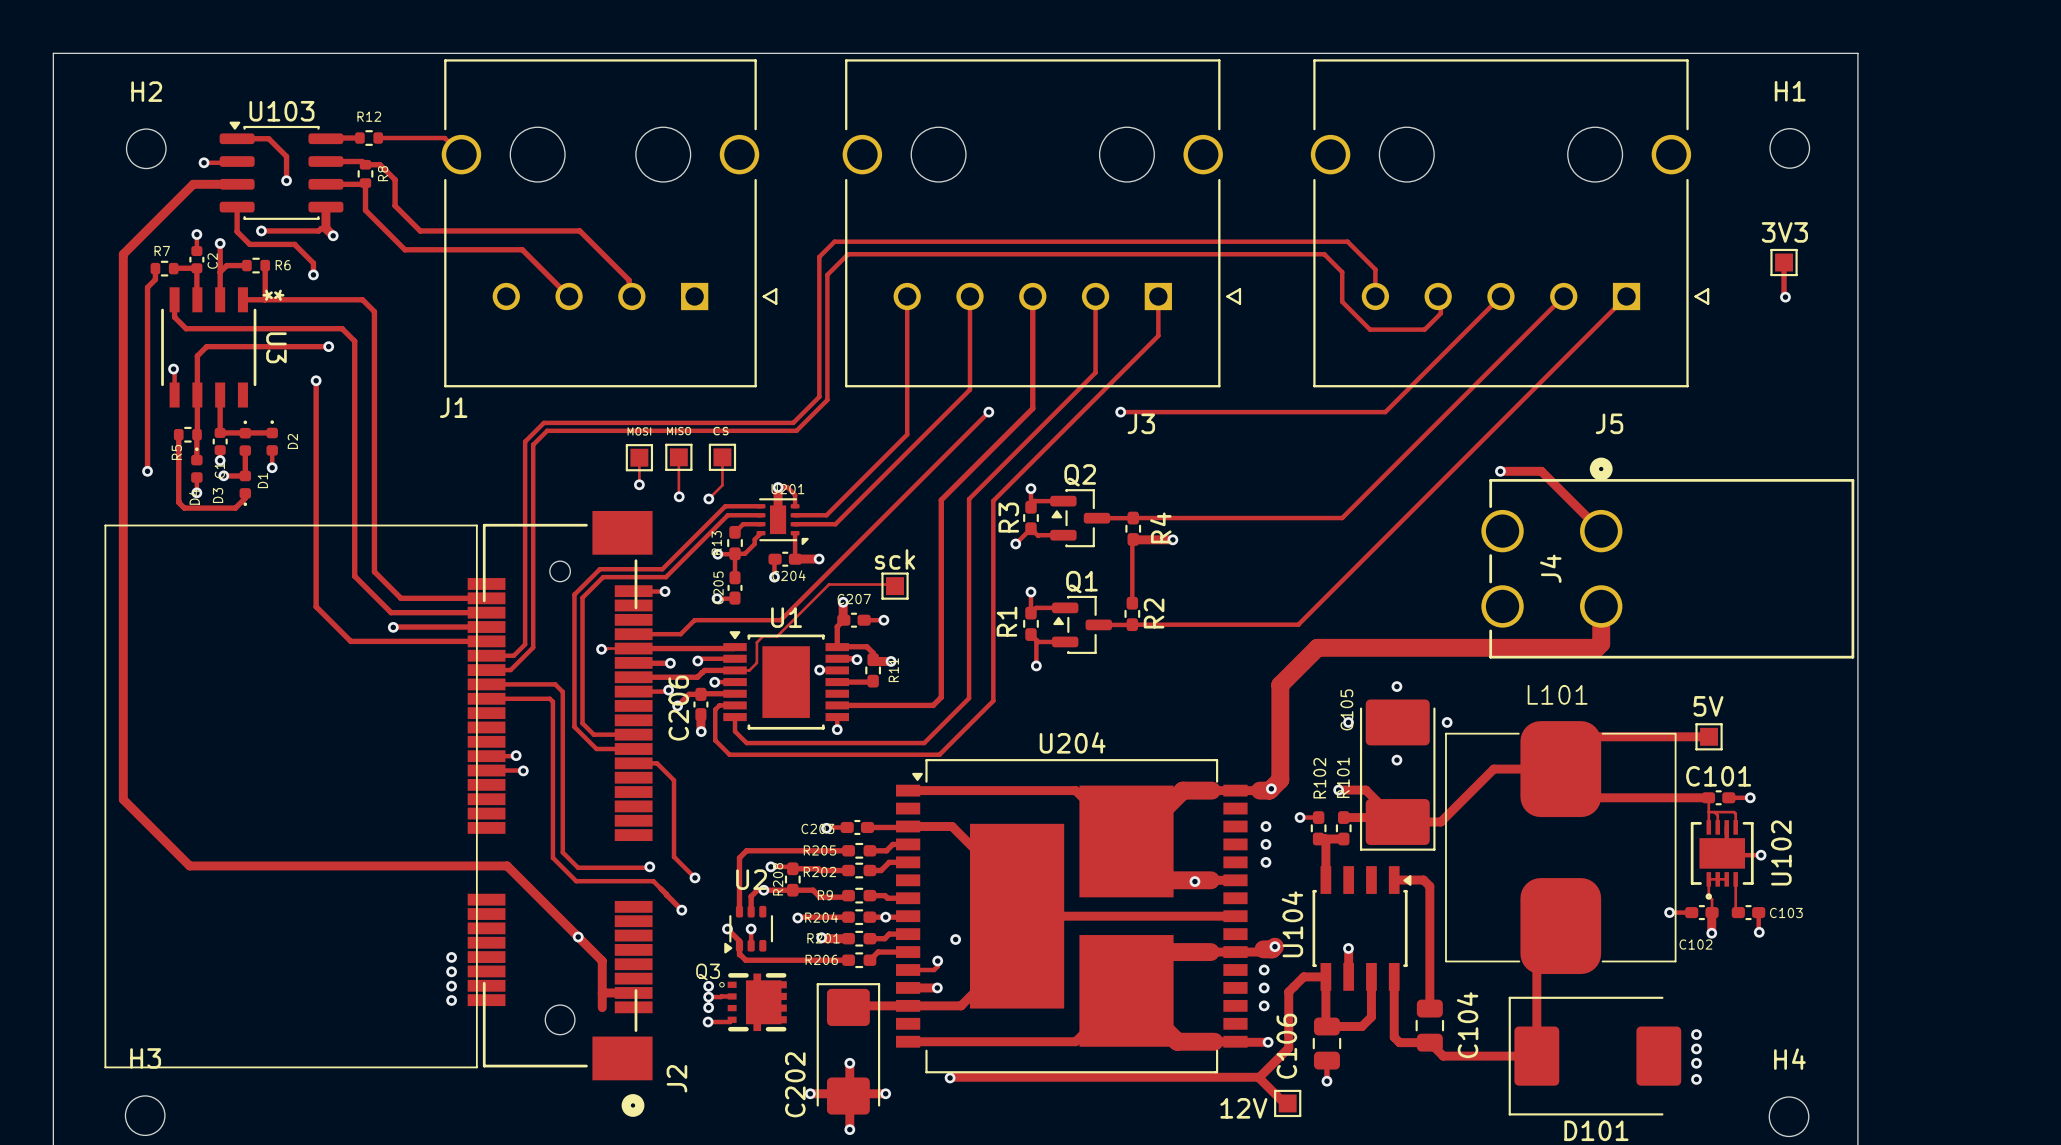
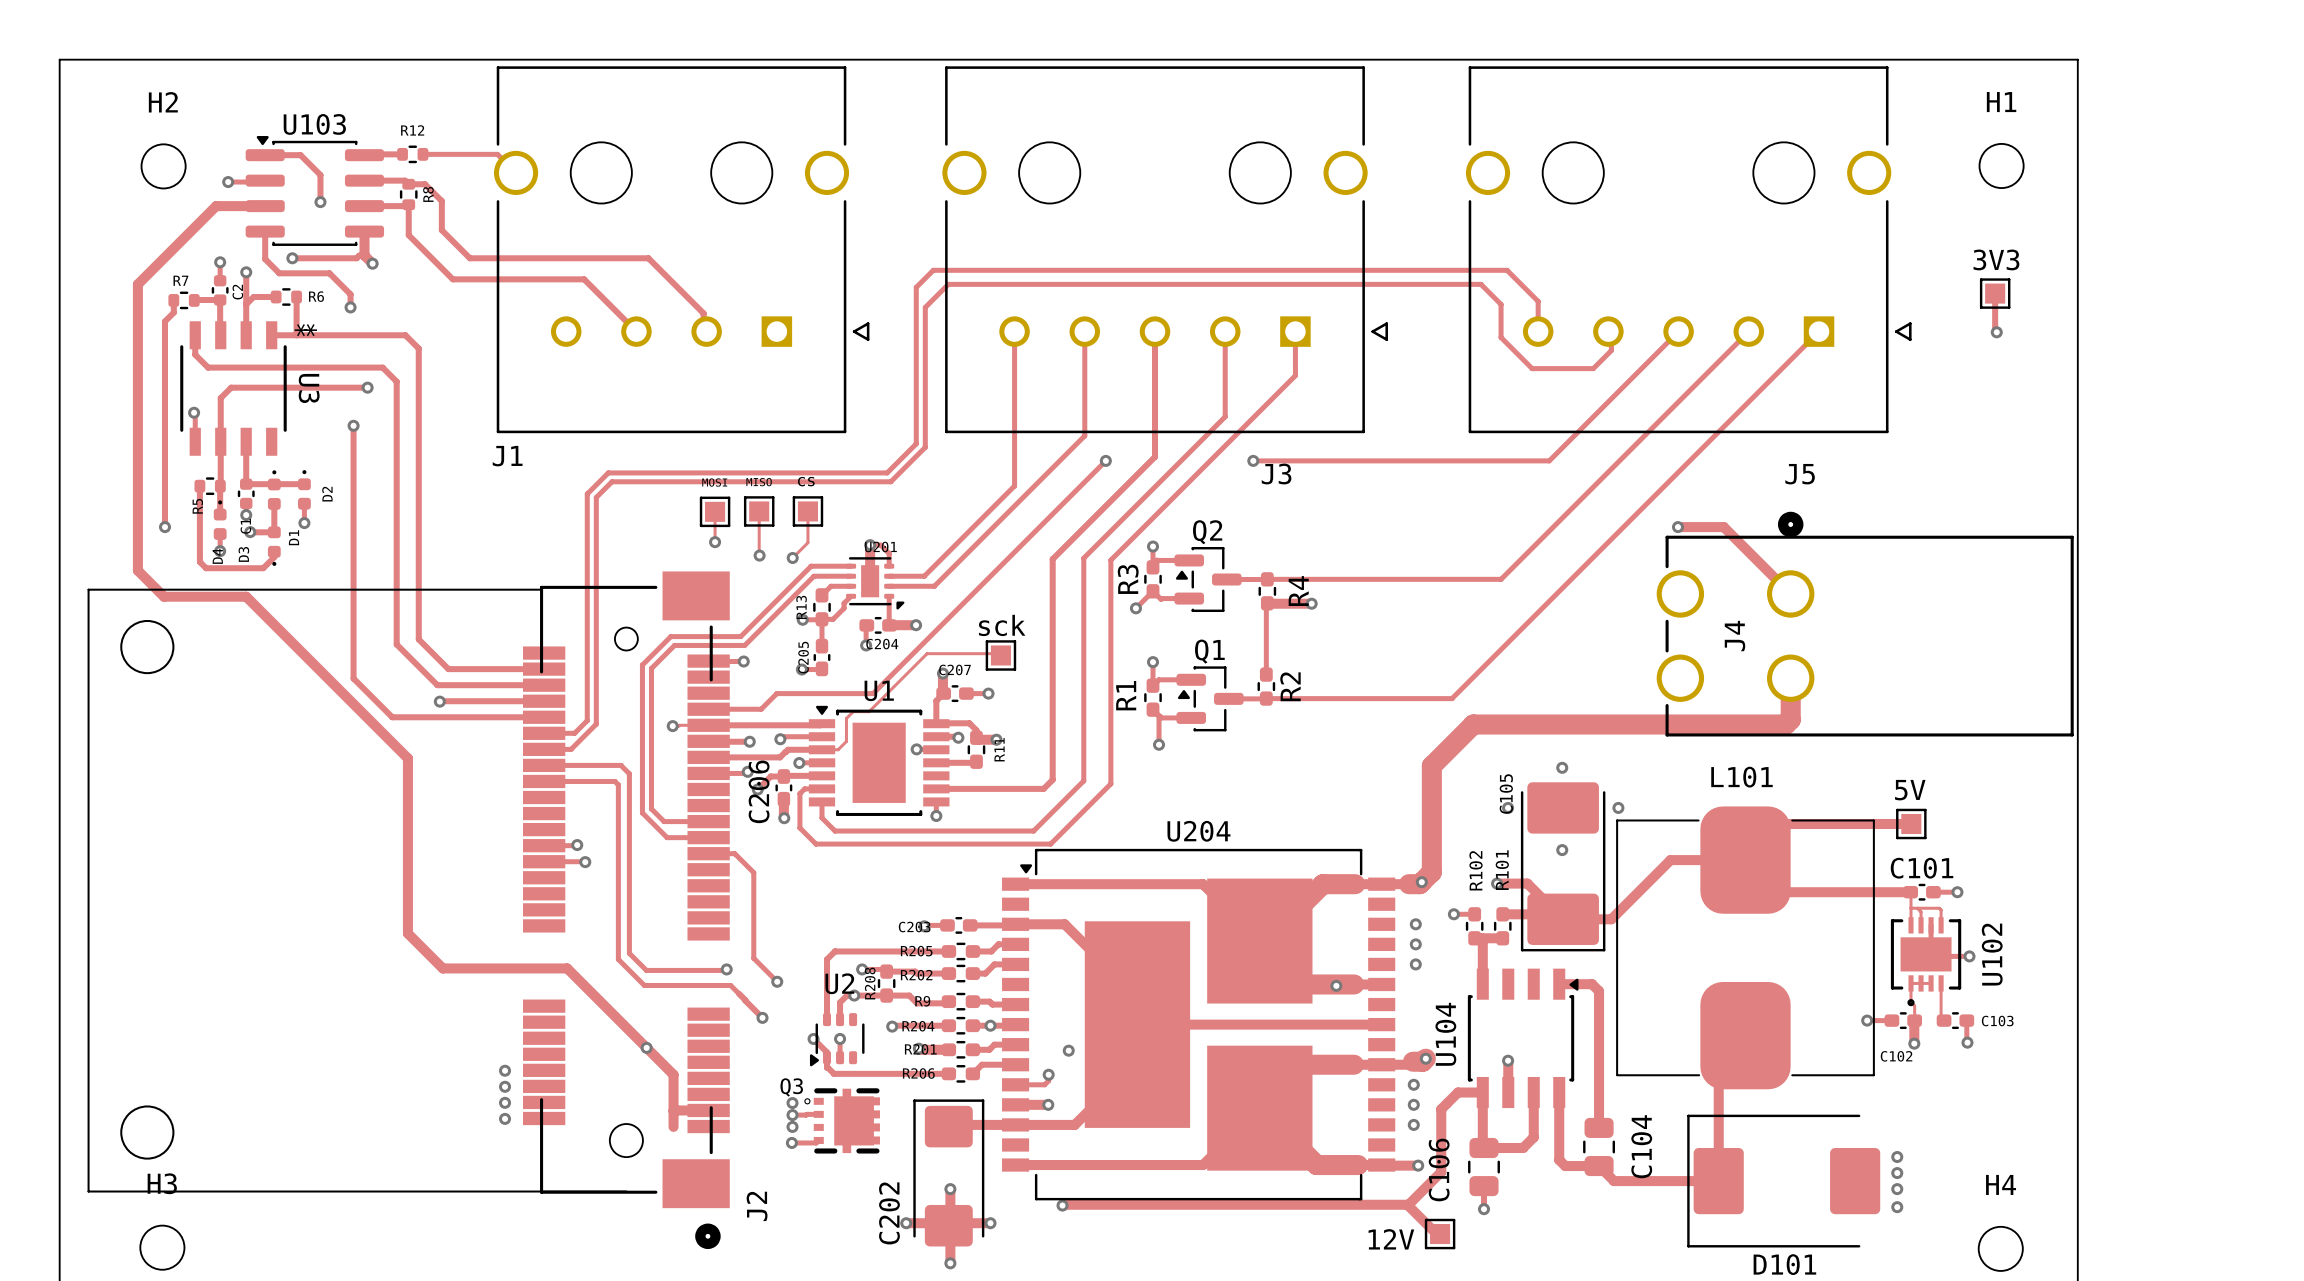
track: (123, 510) (123, 799) (189, 865) (395, 865) -> (137, 570) (163, 596) (246, 596) (407, 758) (407, 933) (442, 968)
J2 footprint: [467, 510, 653, 1117] -> [87, 571, 730, 1250]
line: (105, 525) (476, 525) (476, 1067) (105, 1067) (105, 525) -> none

